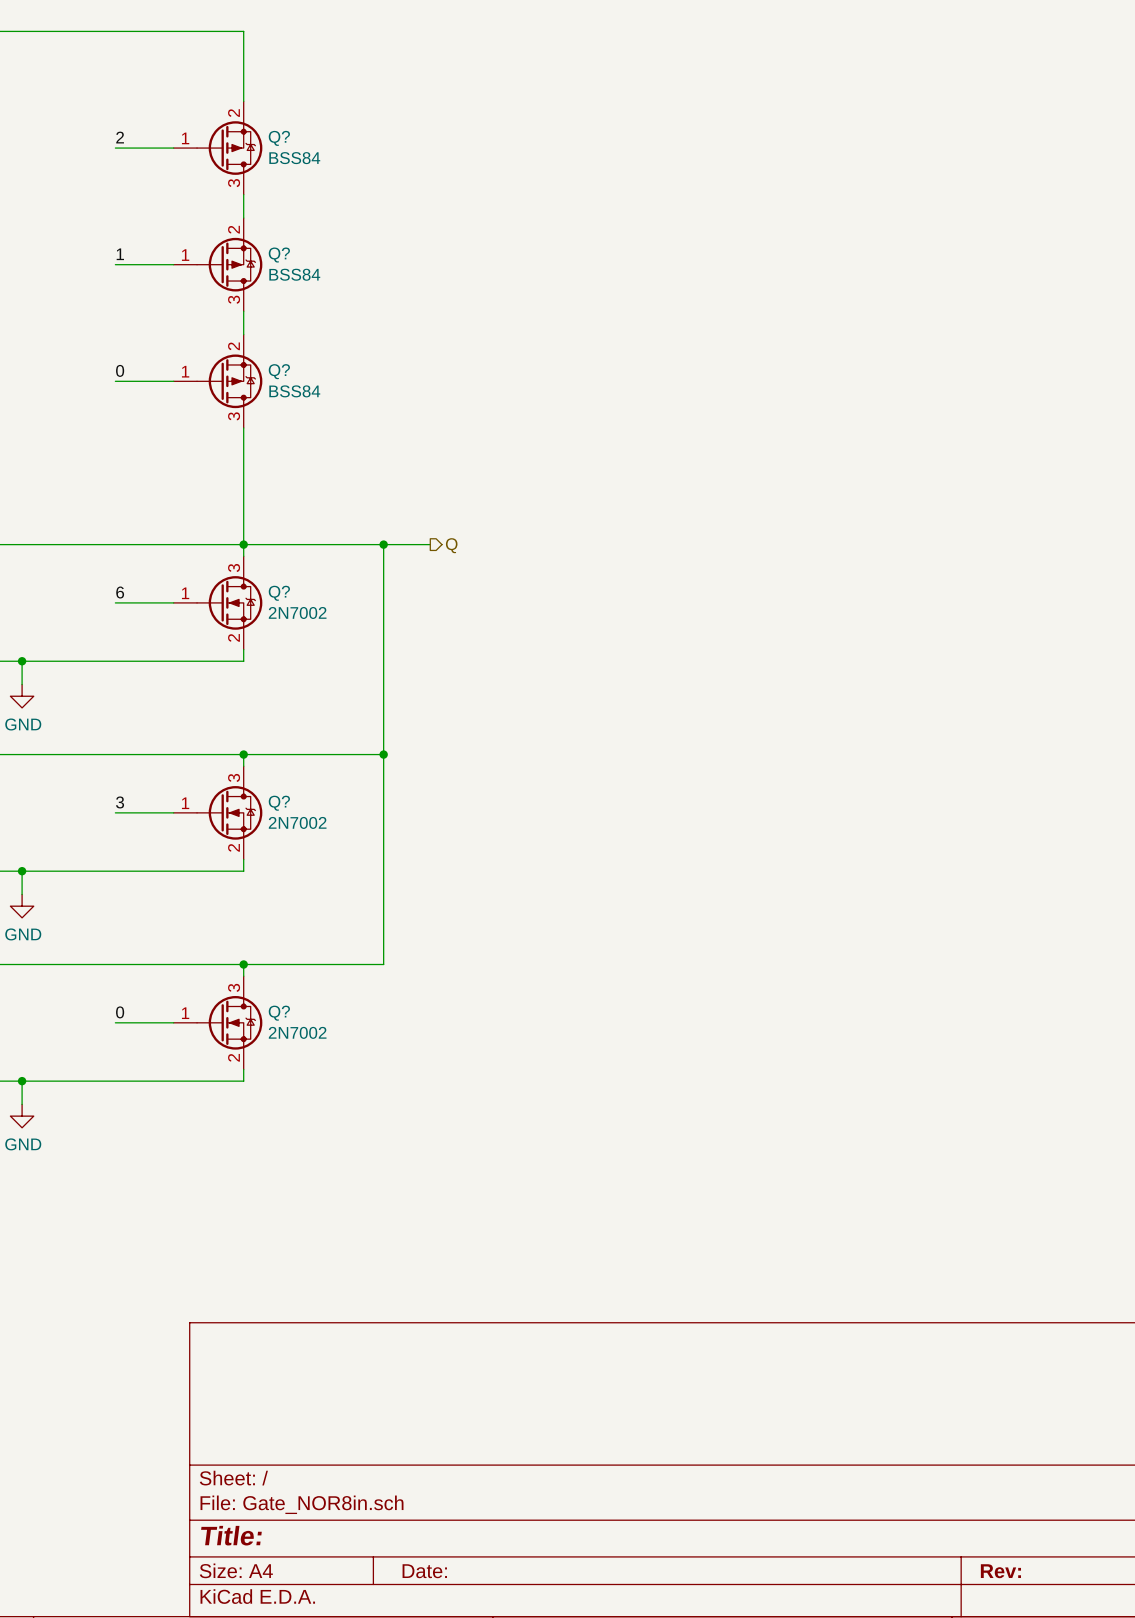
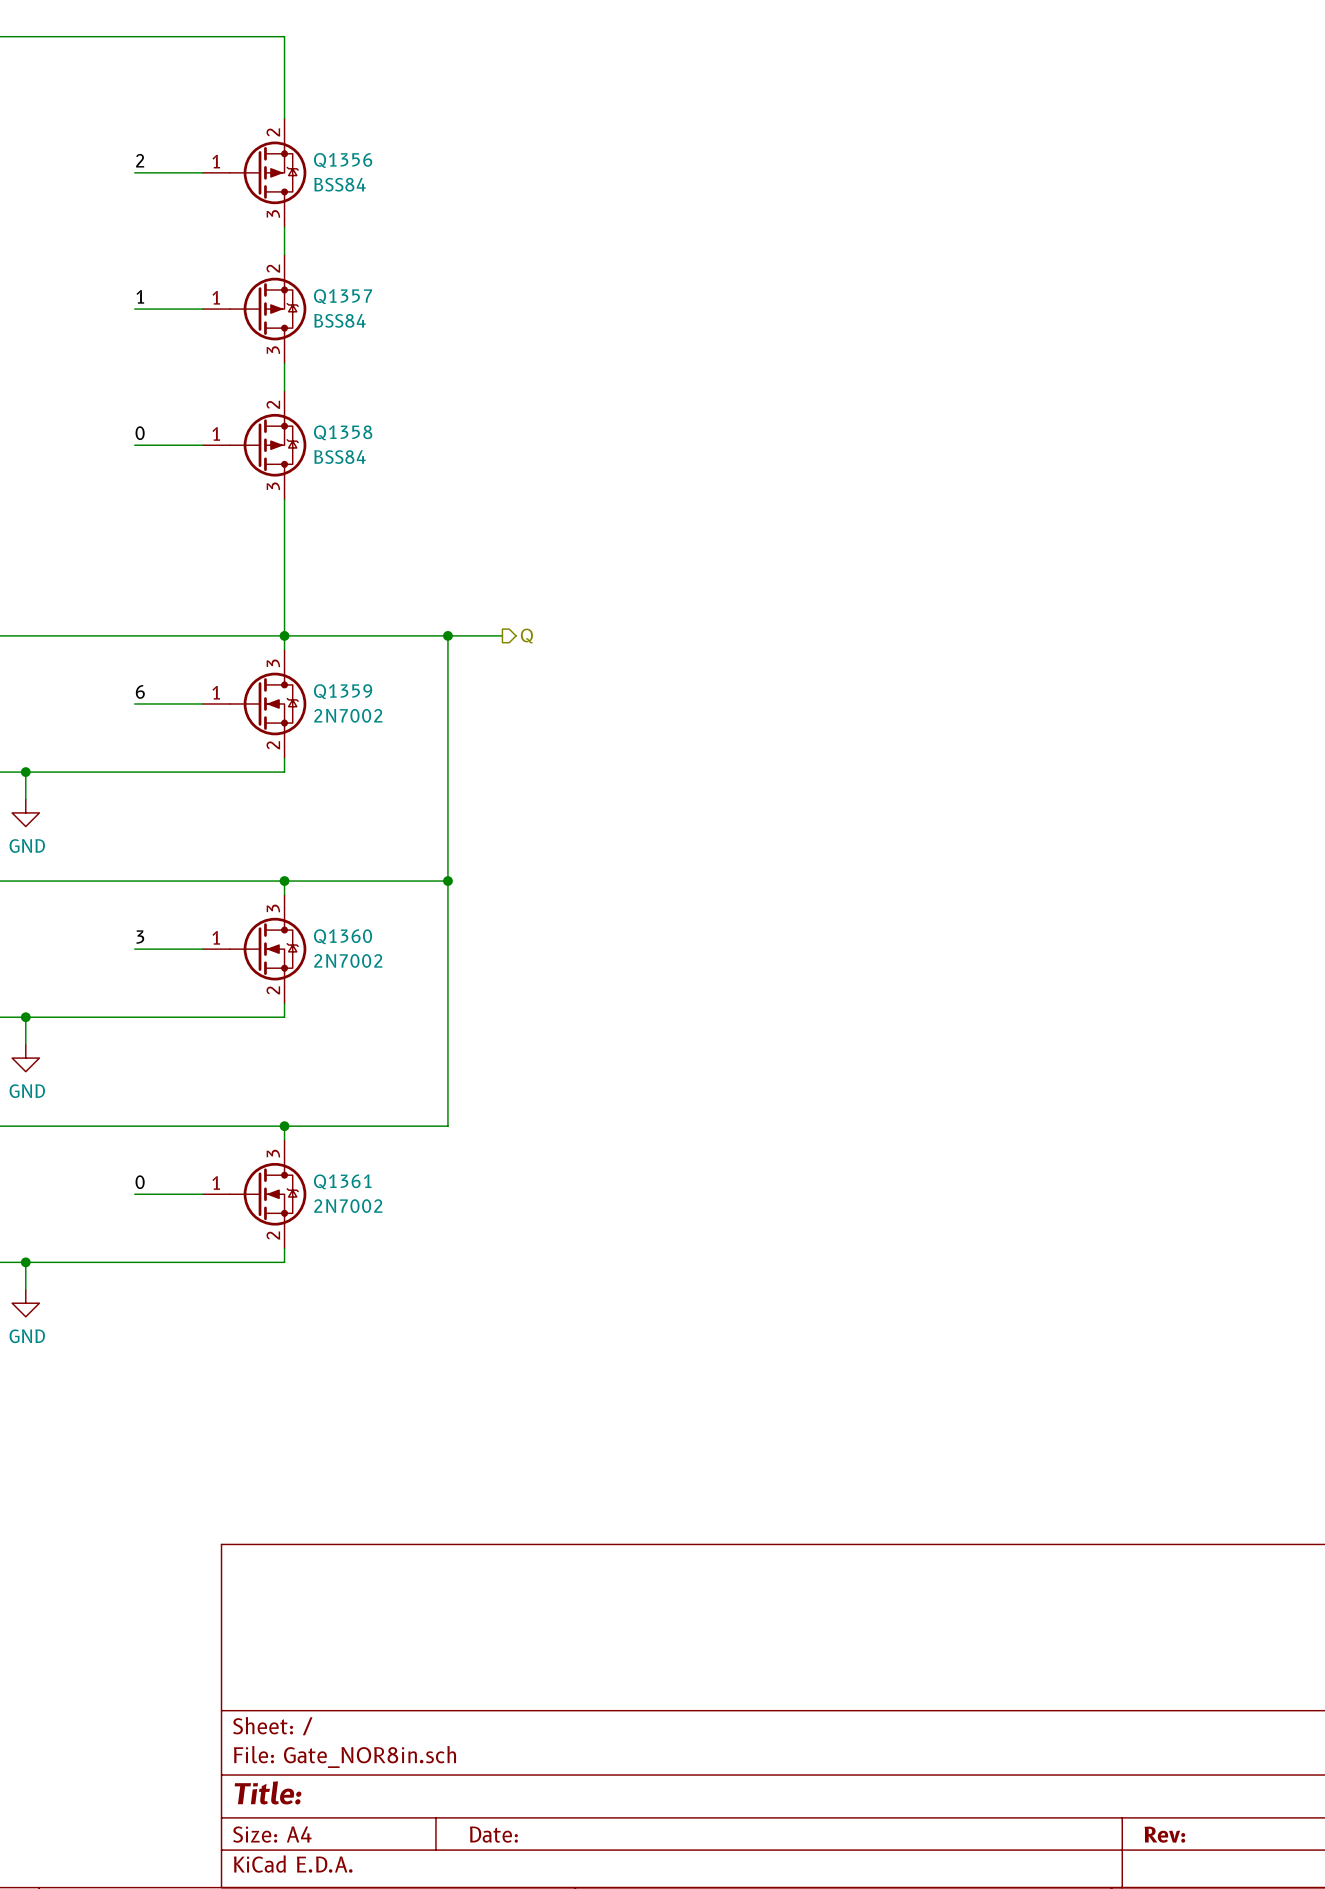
Q? name: Q? (279, 138) -> Q1356 (343, 160)
Q? name: Q? (279, 255) -> Q1357 (342, 296)
Q? name: Q? (279, 371) -> Q1358 (343, 432)
Q? name: Q? (279, 593) -> Q1359 (343, 691)
Q? name: Q? (279, 803) -> Q1360 (343, 936)
Q? name: Q? (279, 1013) -> Q1361 (342, 1181)

